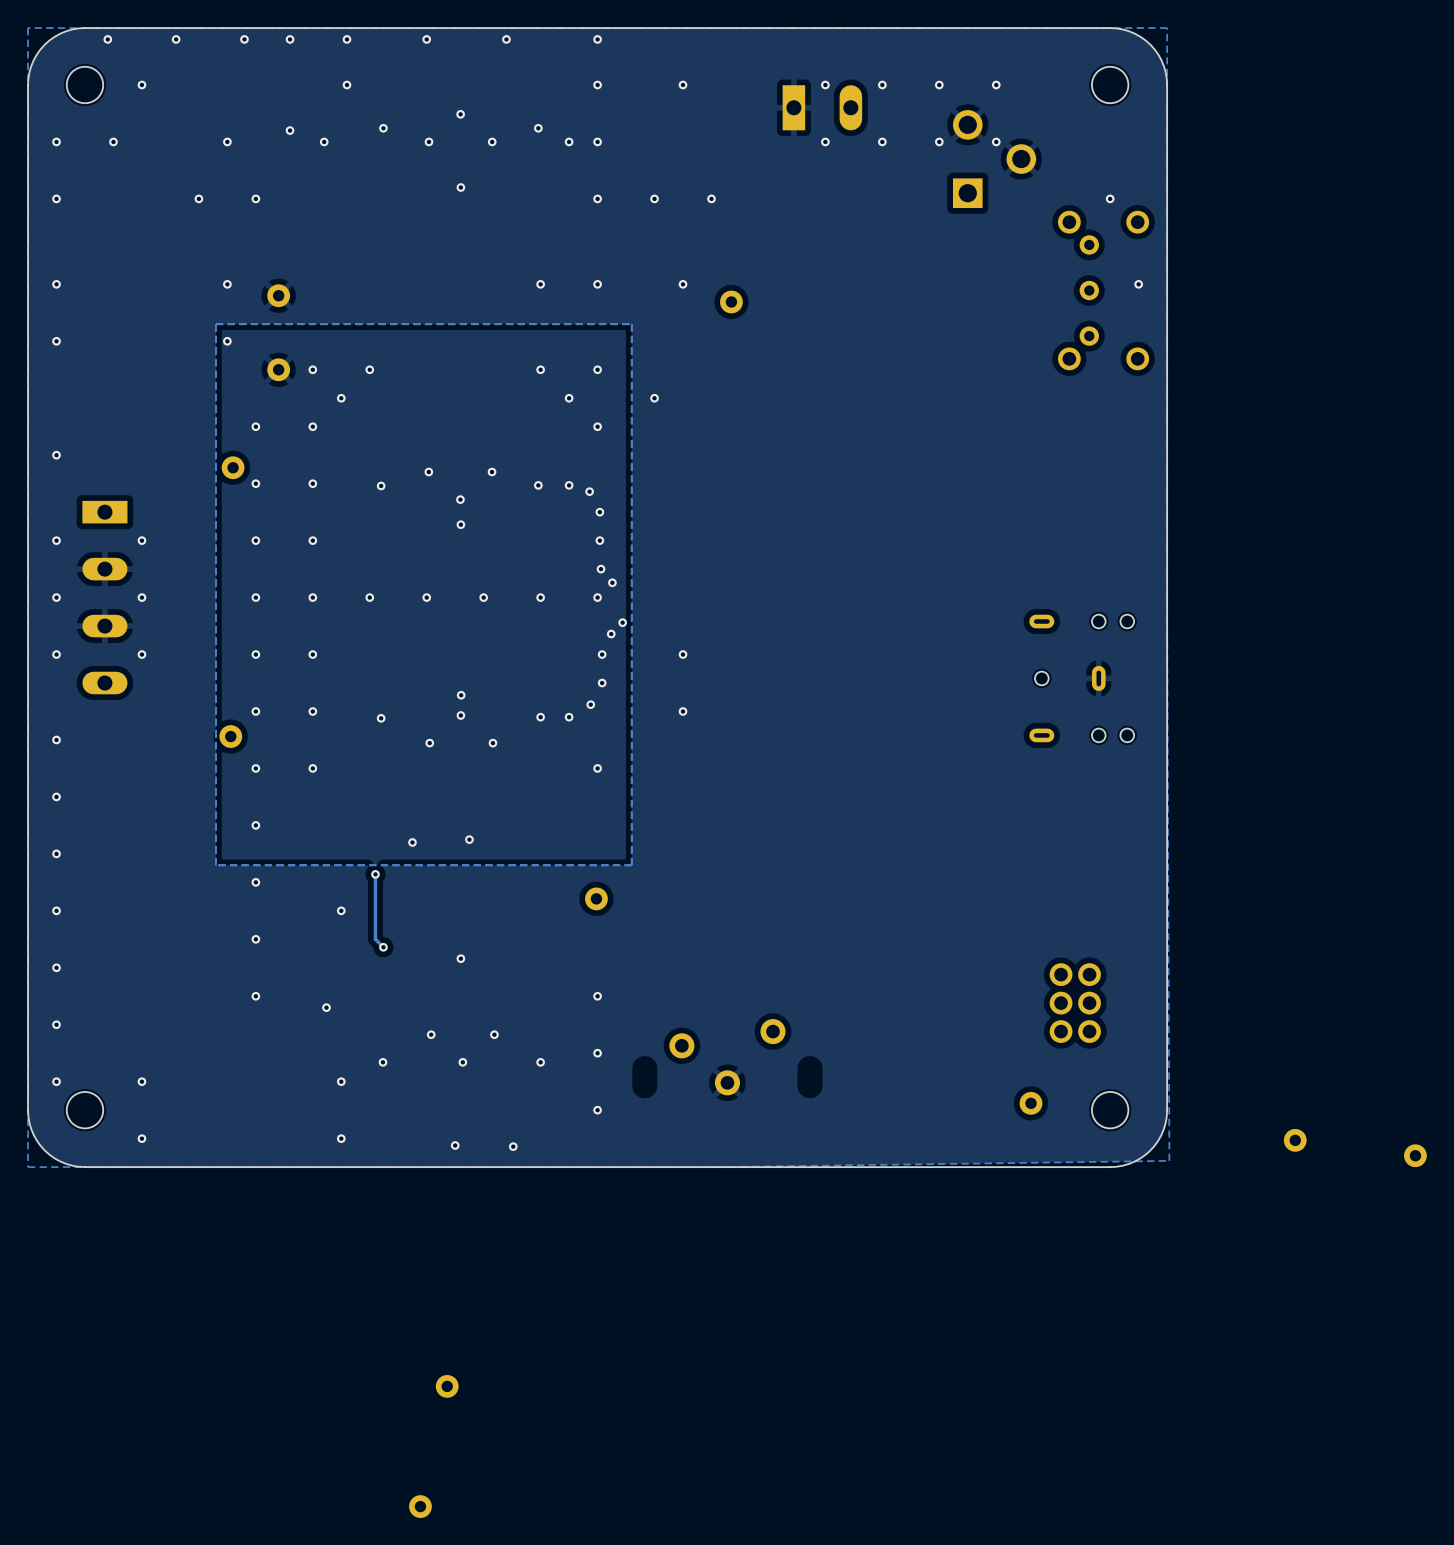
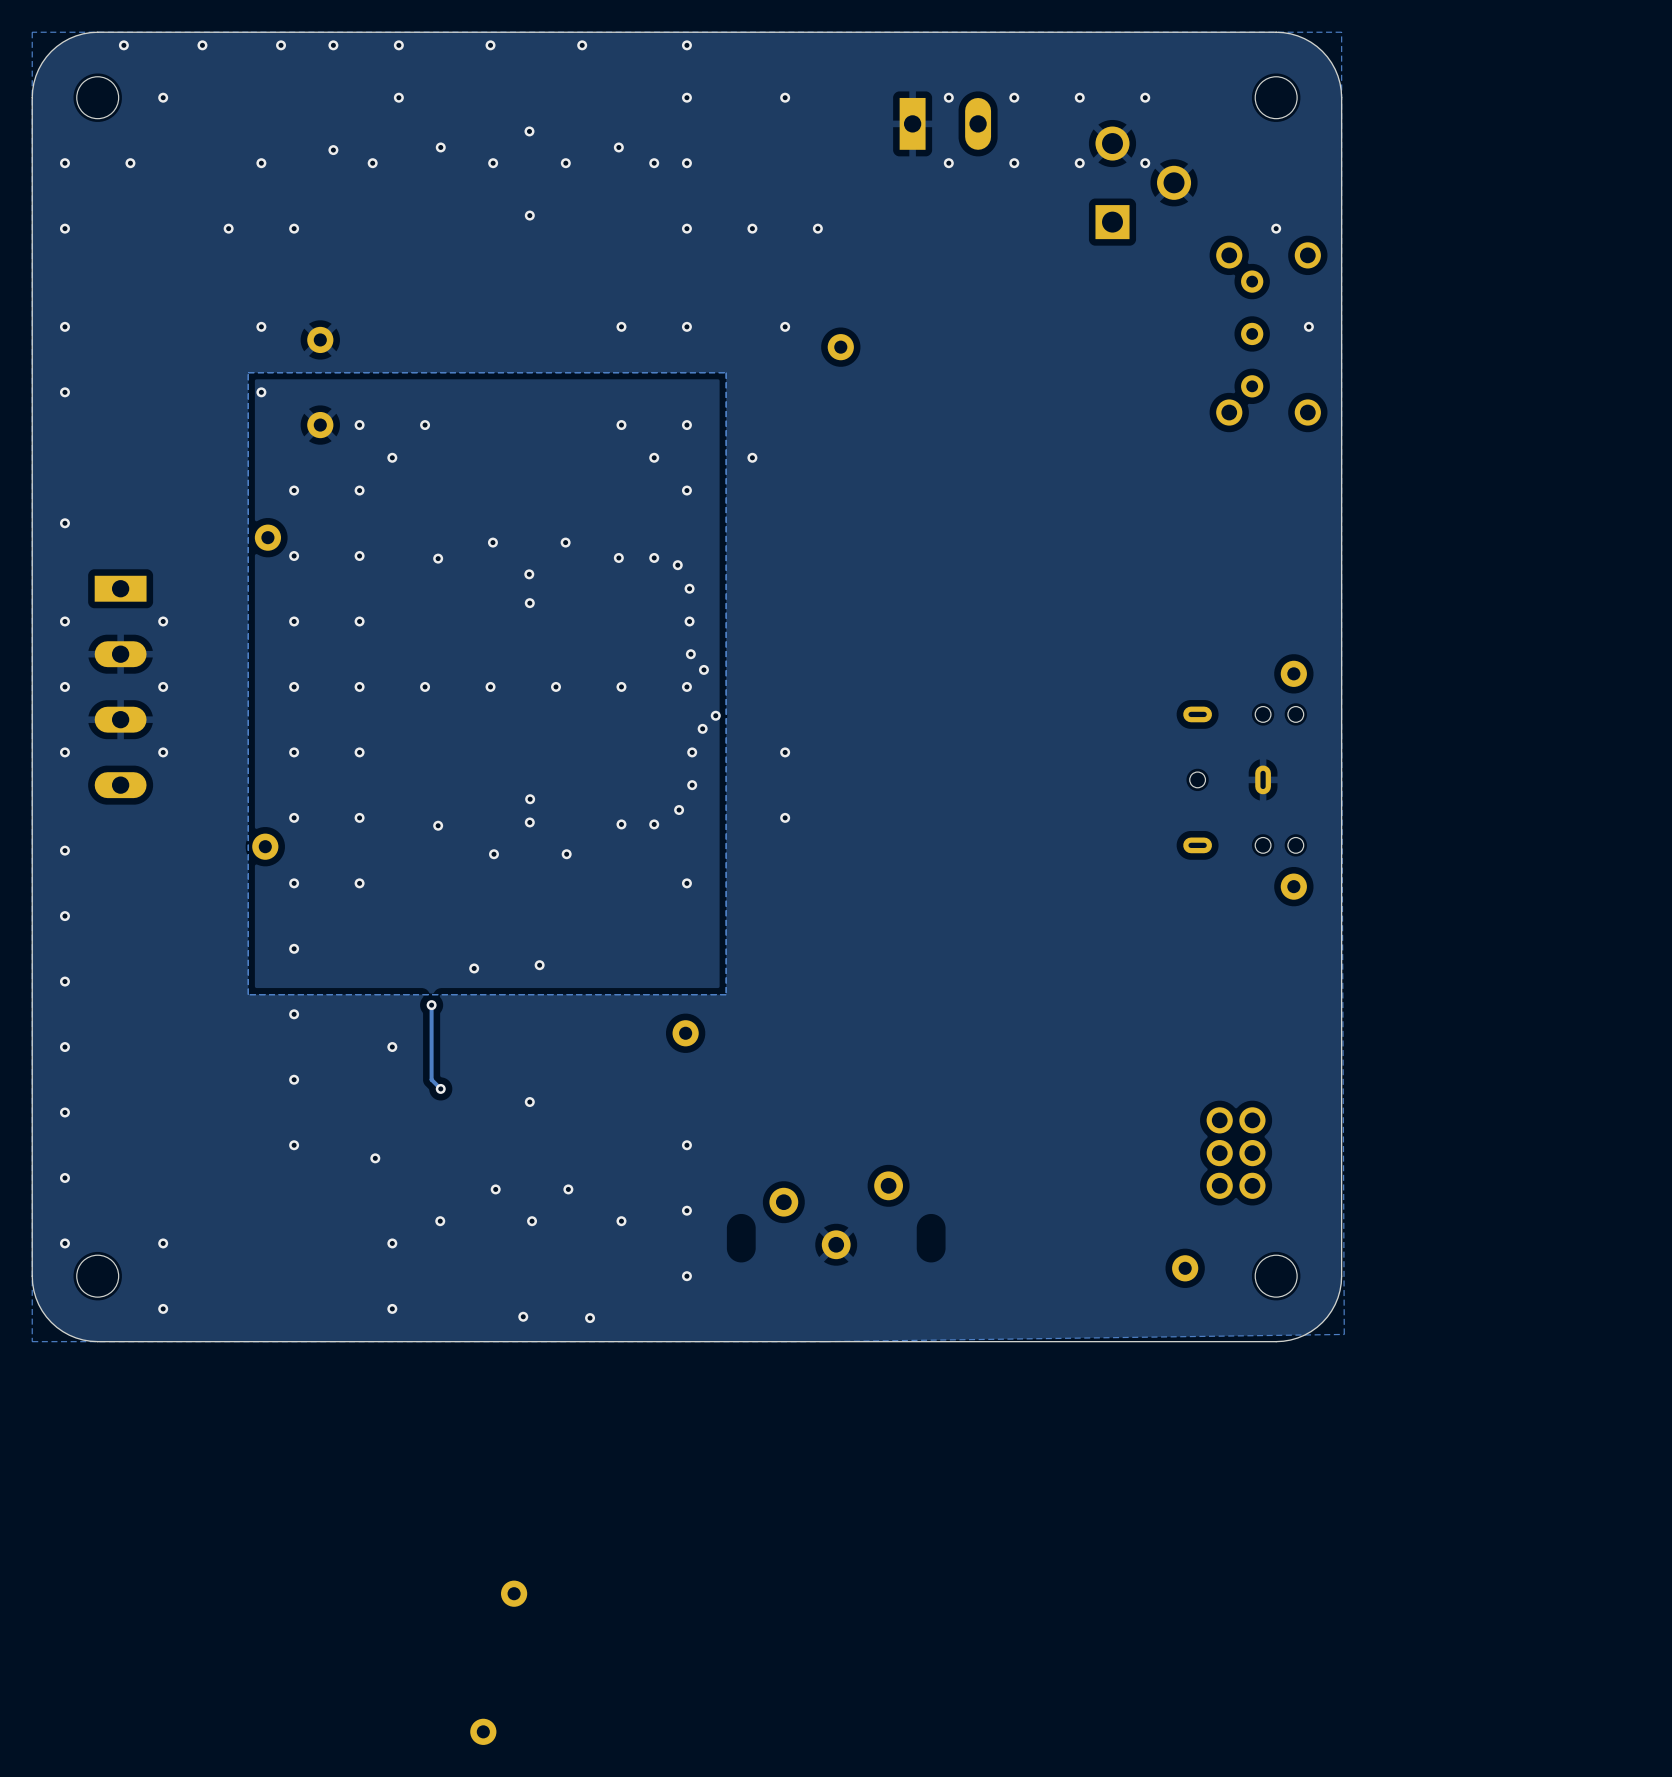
part: none -> (1293, 673)
part: none -> (1293, 886)
part: (1295, 1140) -> none
part: (1415, 1155) -> none

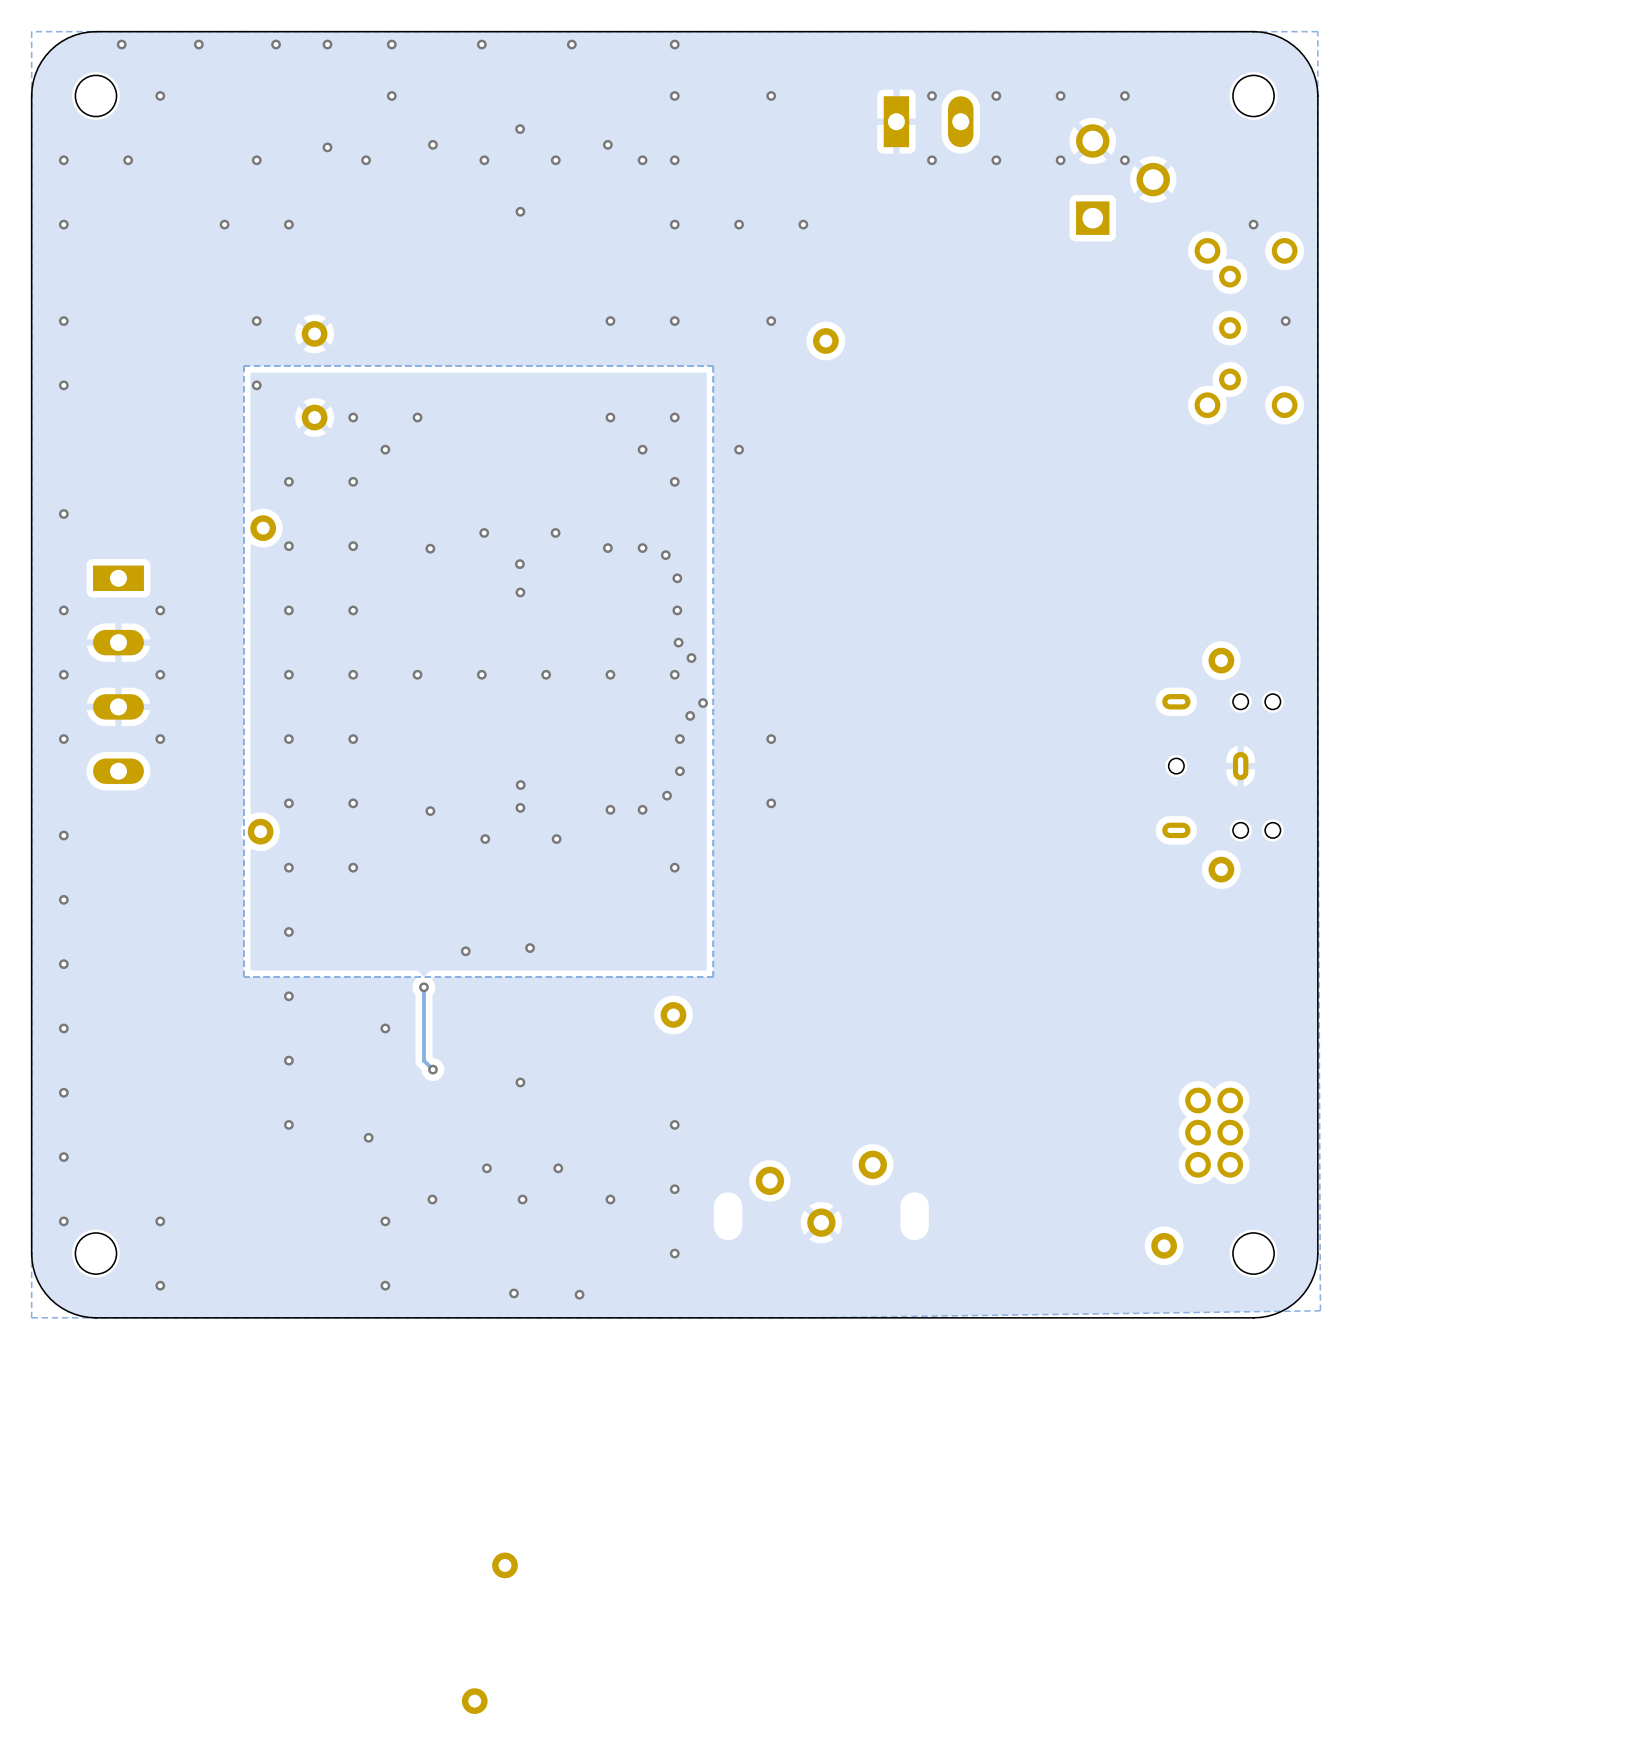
part position: (1293, 673) -> (1221, 660)
part position: (1293, 886) -> (1221, 869)

